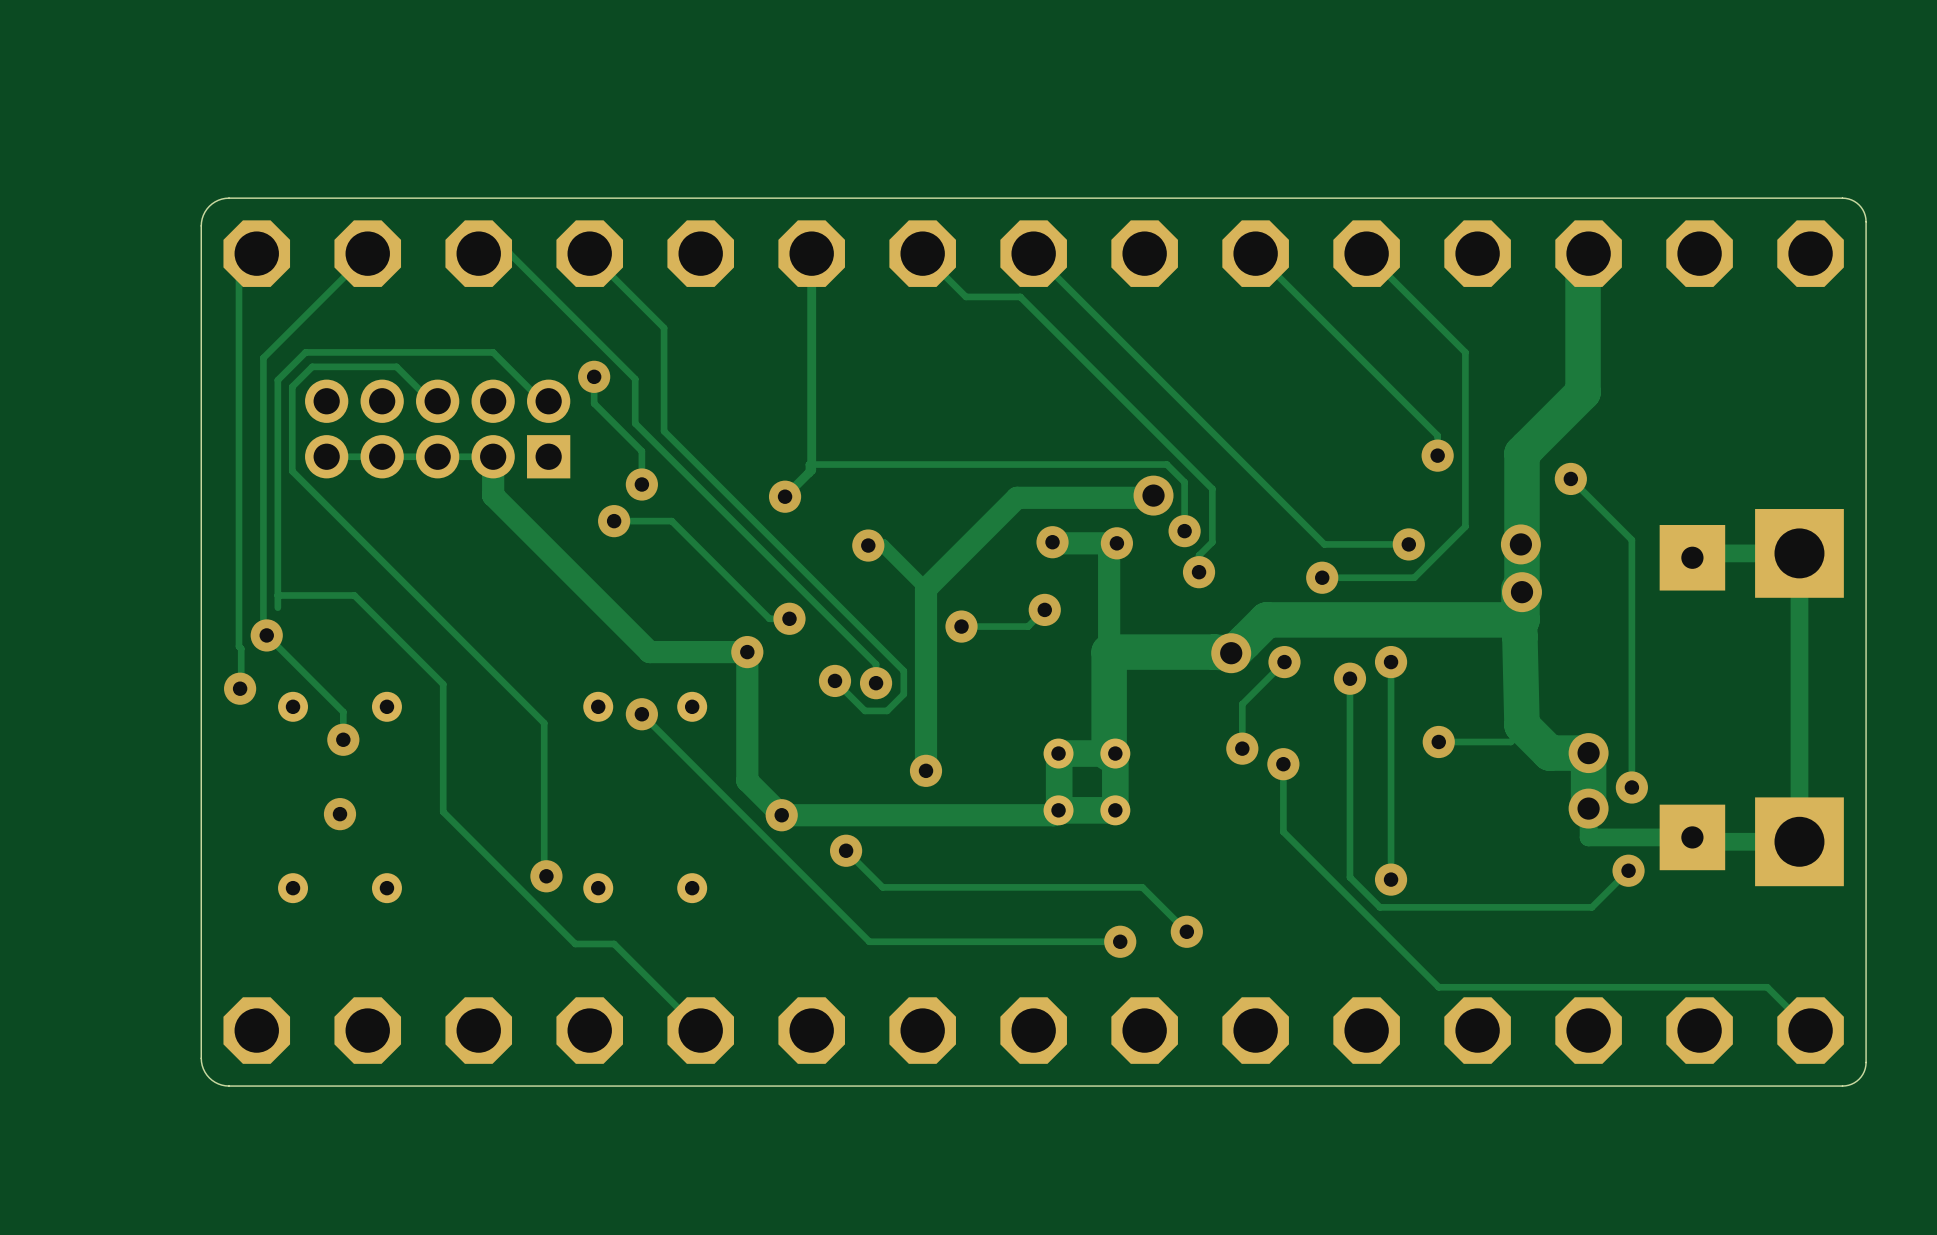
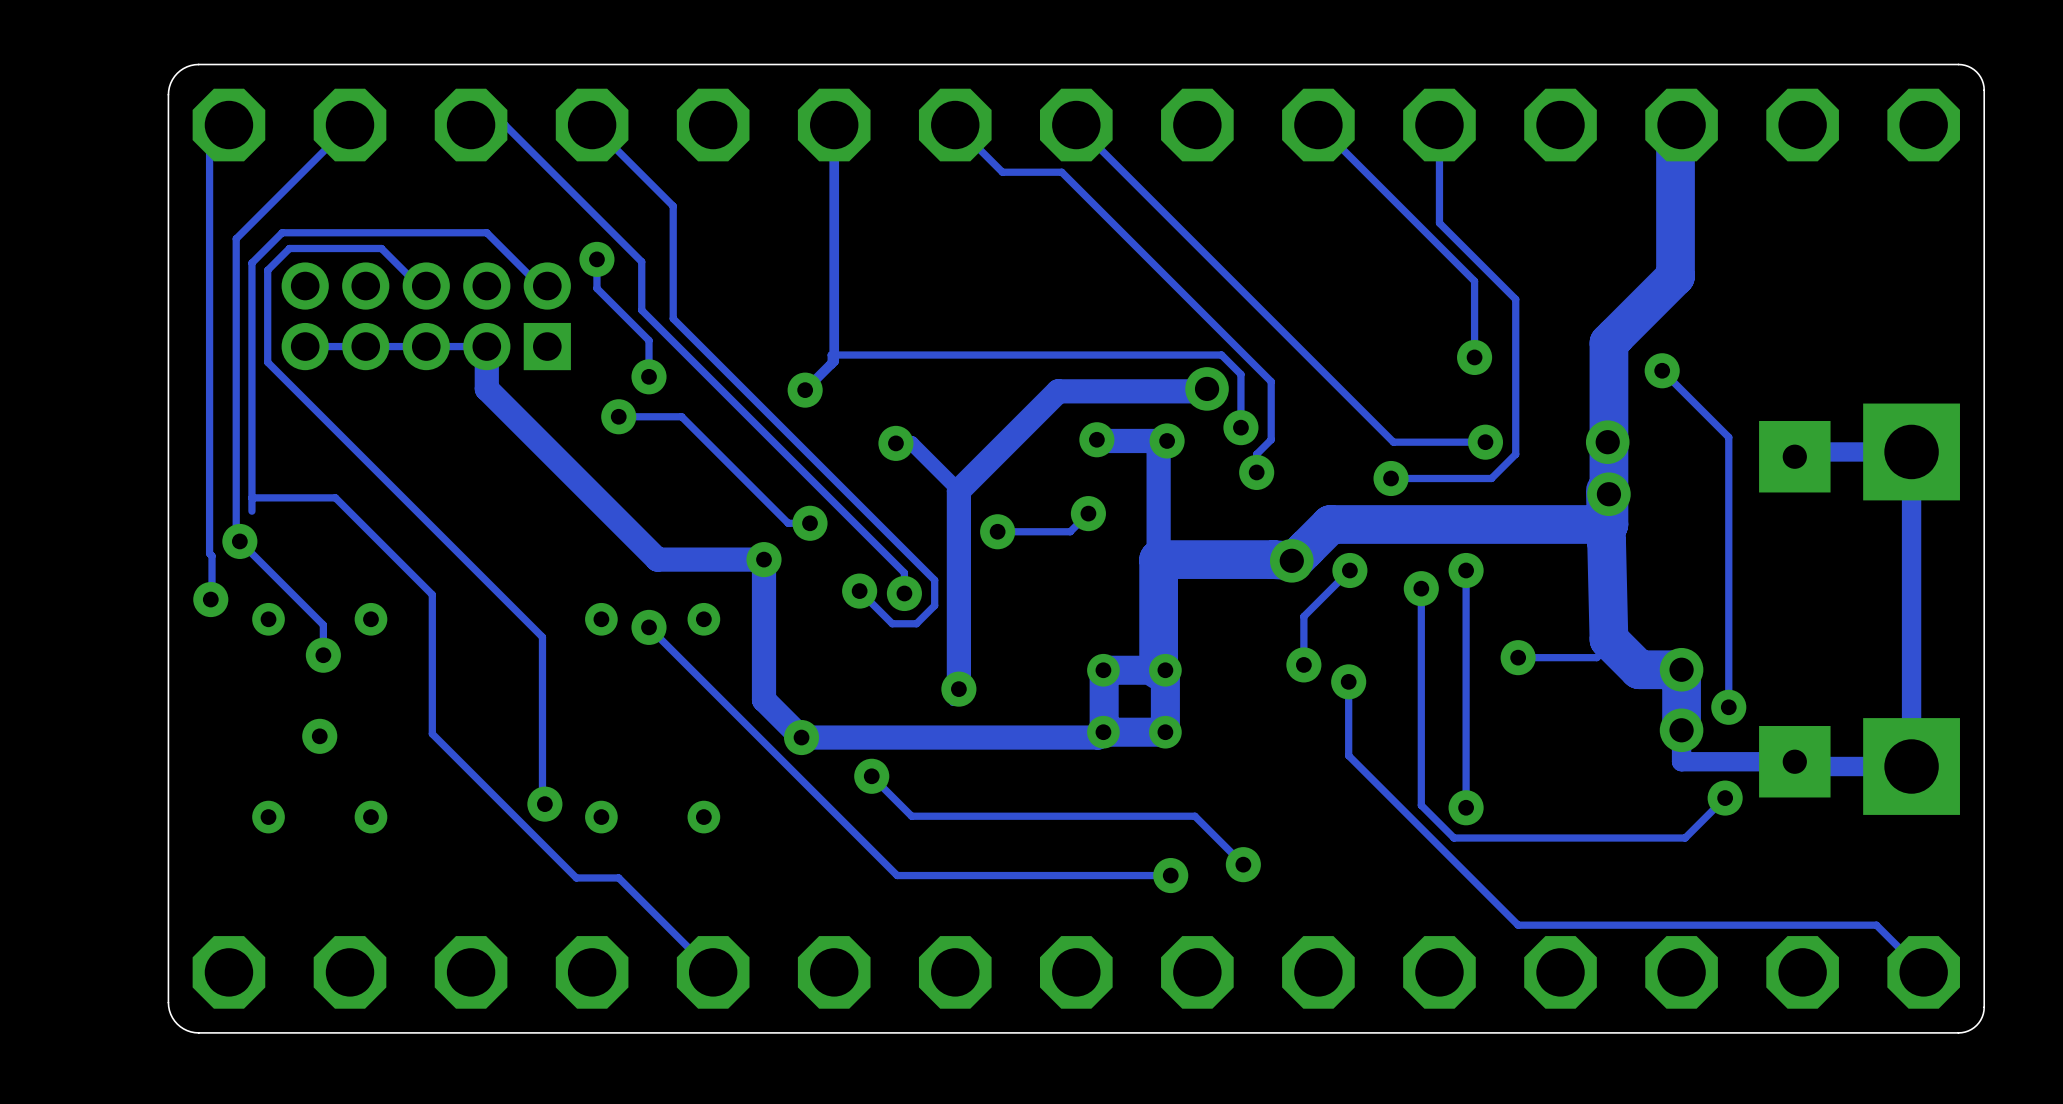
track: (1366, 253) (1465, 352) (1465, 526) (1436, 555) -> (1439, 125) (1439, 223) (1515, 299) (1515, 454)
track: (1398, 396) (1437, 435) (1437, 455) -> (1474, 281) (1474, 357)
via position: (1437, 455) -> (1474, 357)

